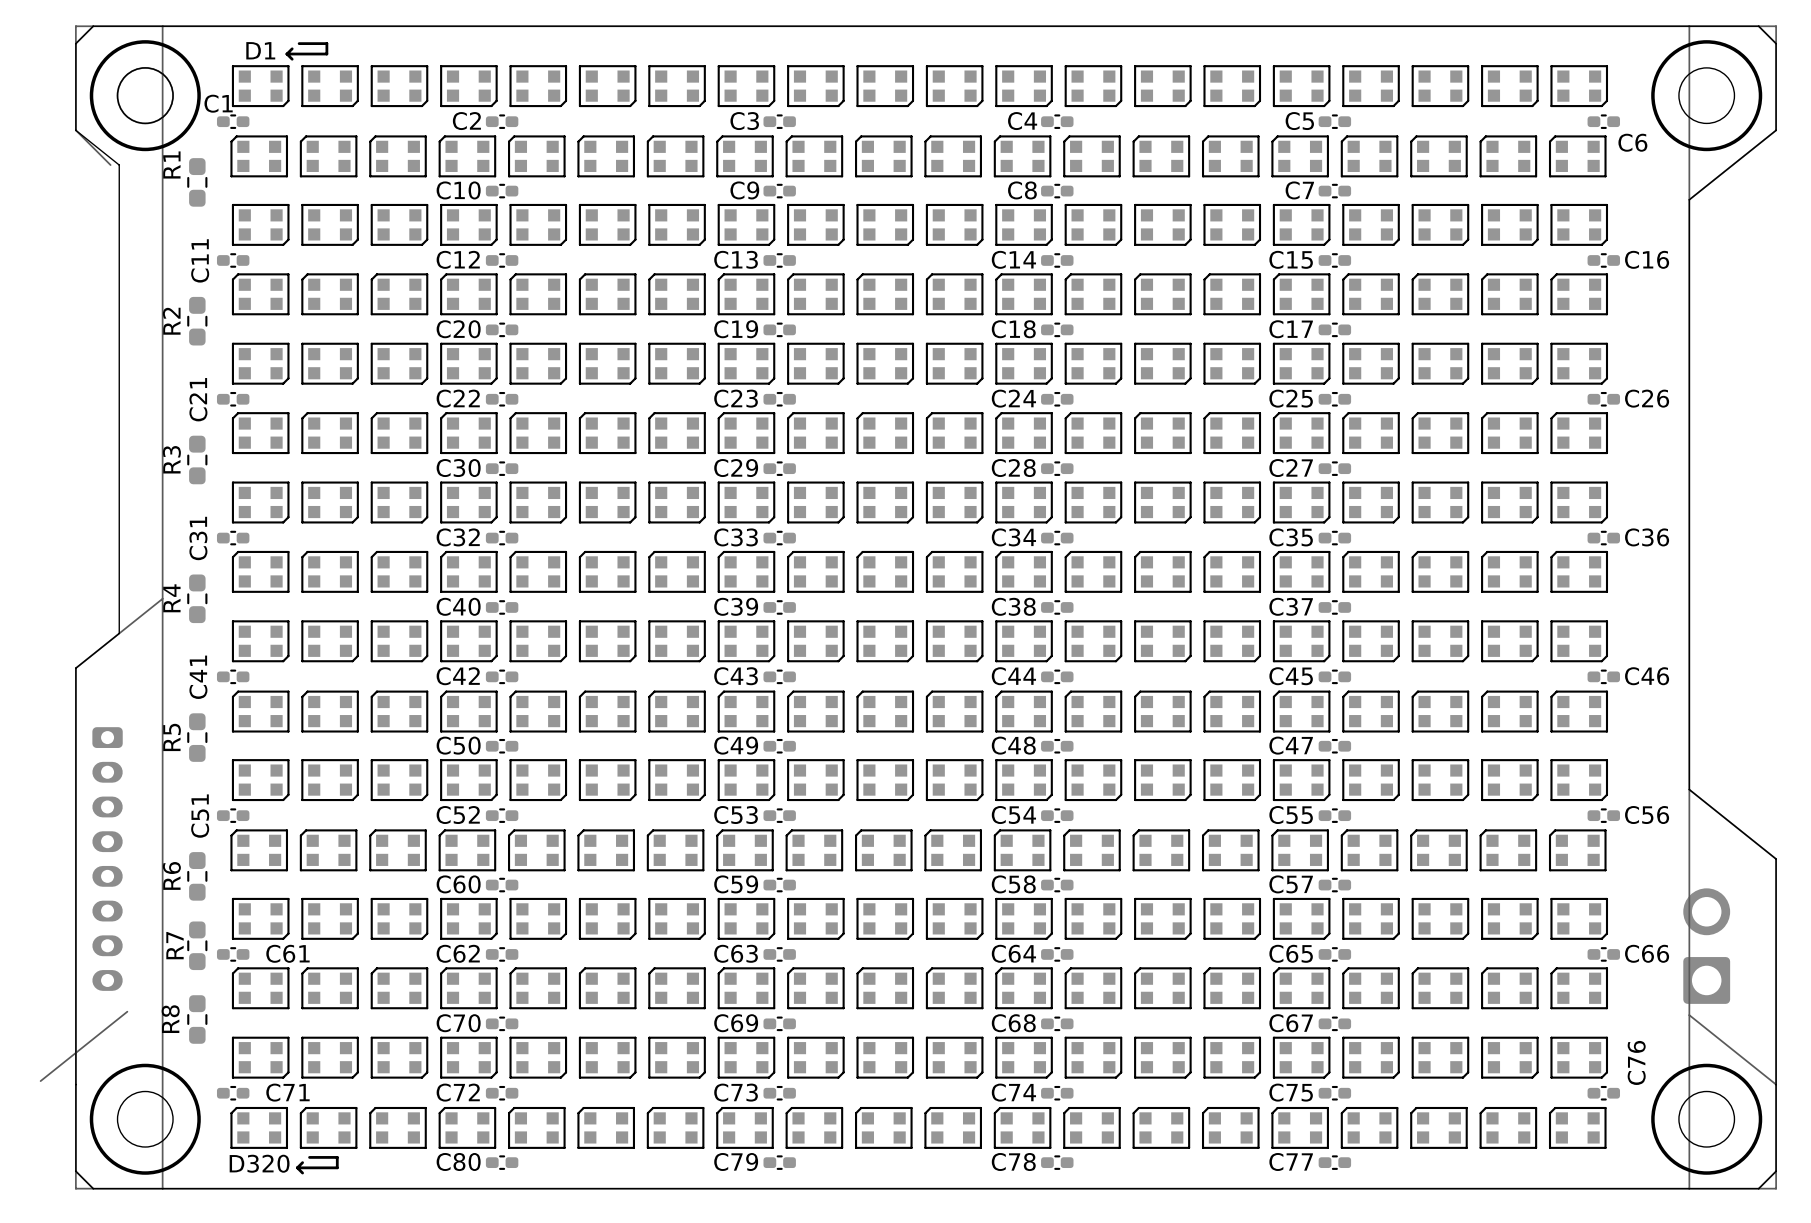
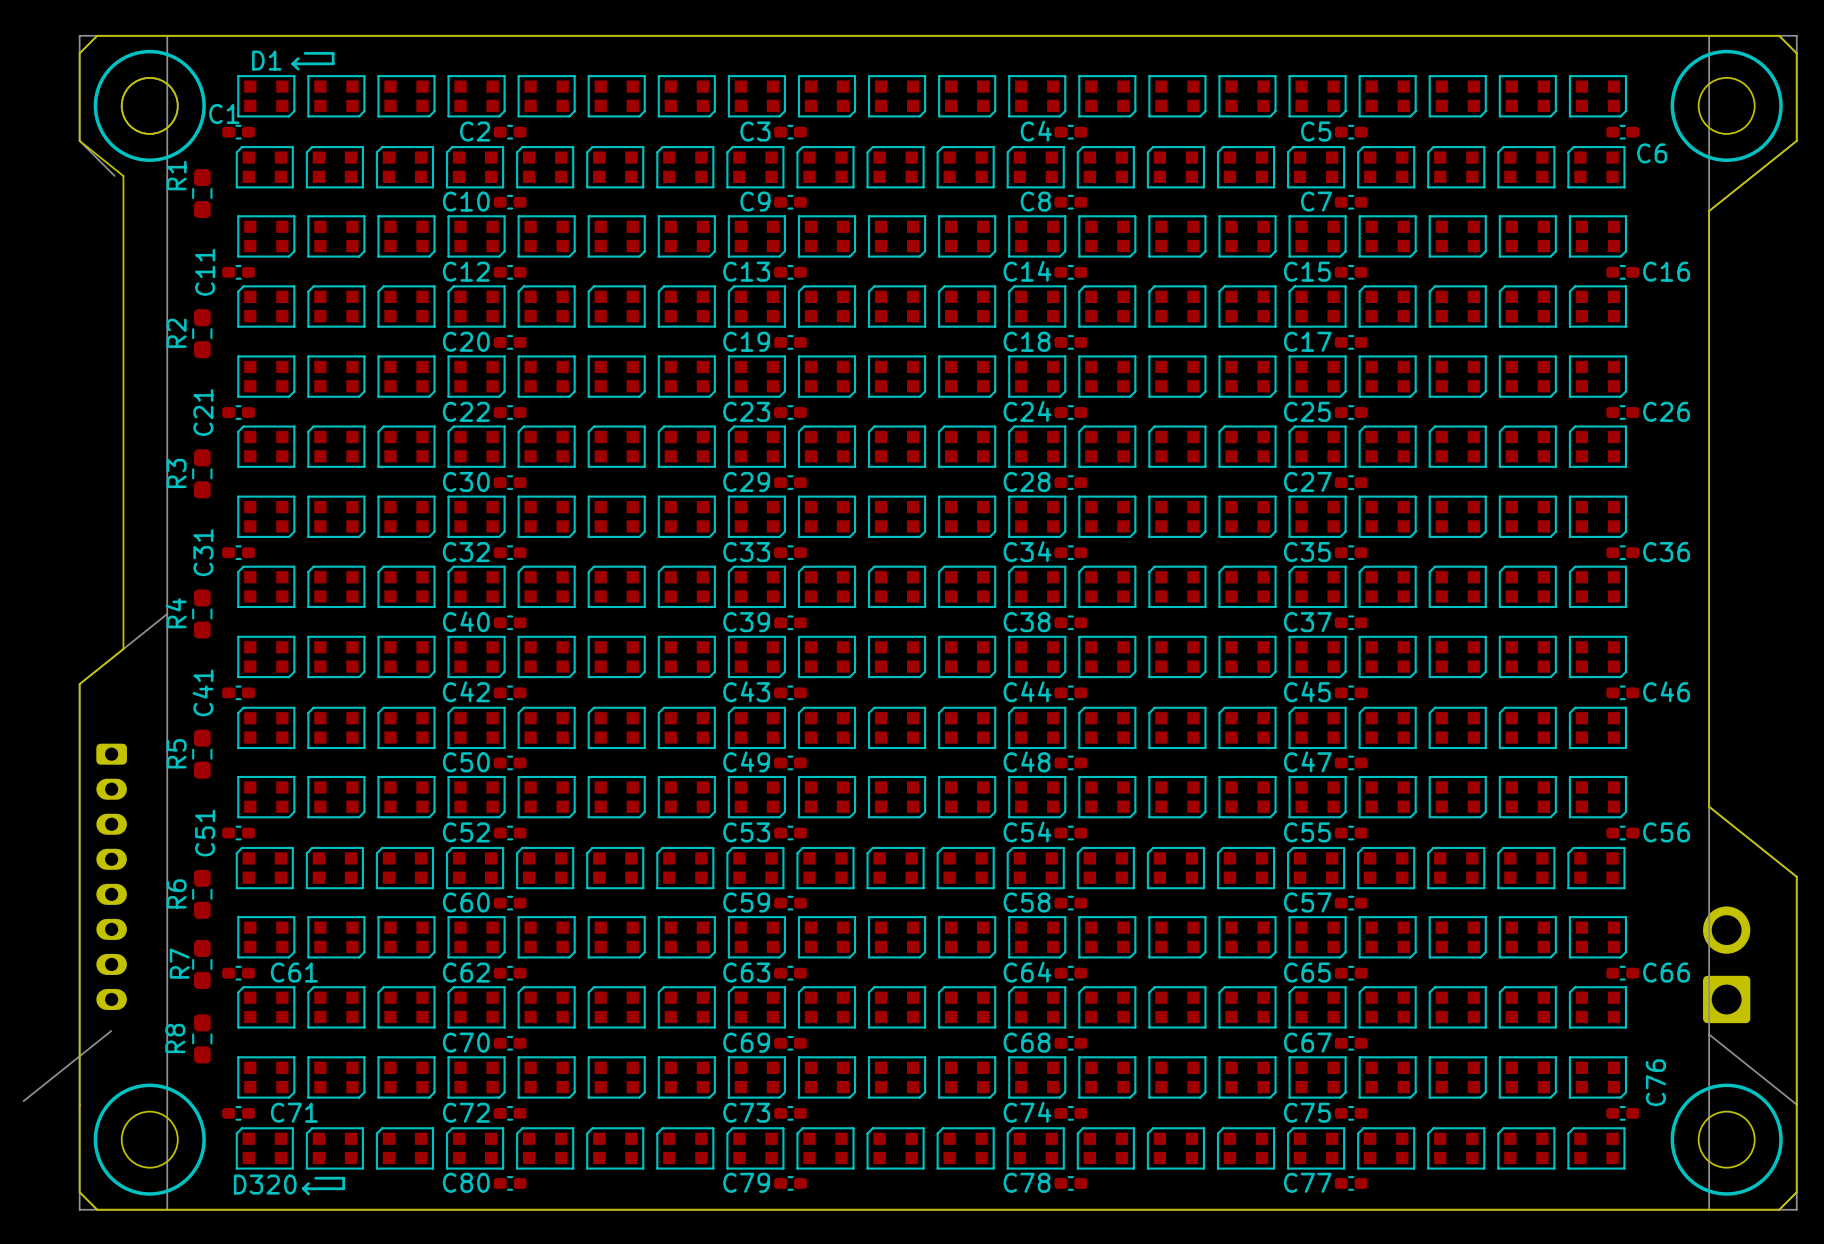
line: (127, 1011) (40, 1081) -> (111, 1031) (23, 1101)

